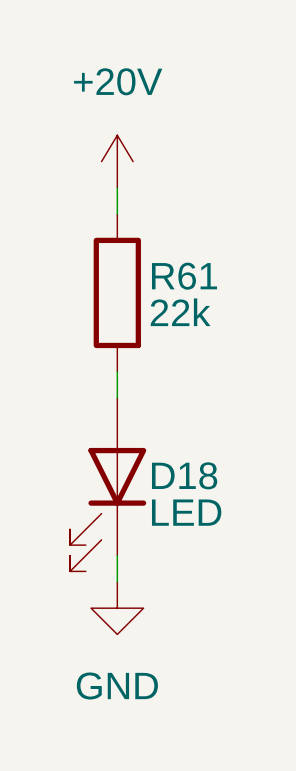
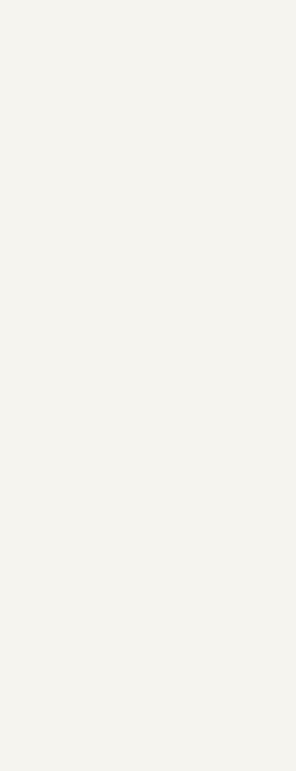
power symbol: +20V (117, 161) -> none
wire: (117, 187) (117, 214) -> none
R61: 22k (117, 292) -> none
wire: (117, 371) (117, 398) -> none
D18: LED (108, 484) -> none
wire: (117, 555) (117, 581) -> none
power symbol: GND (117, 608) -> none

